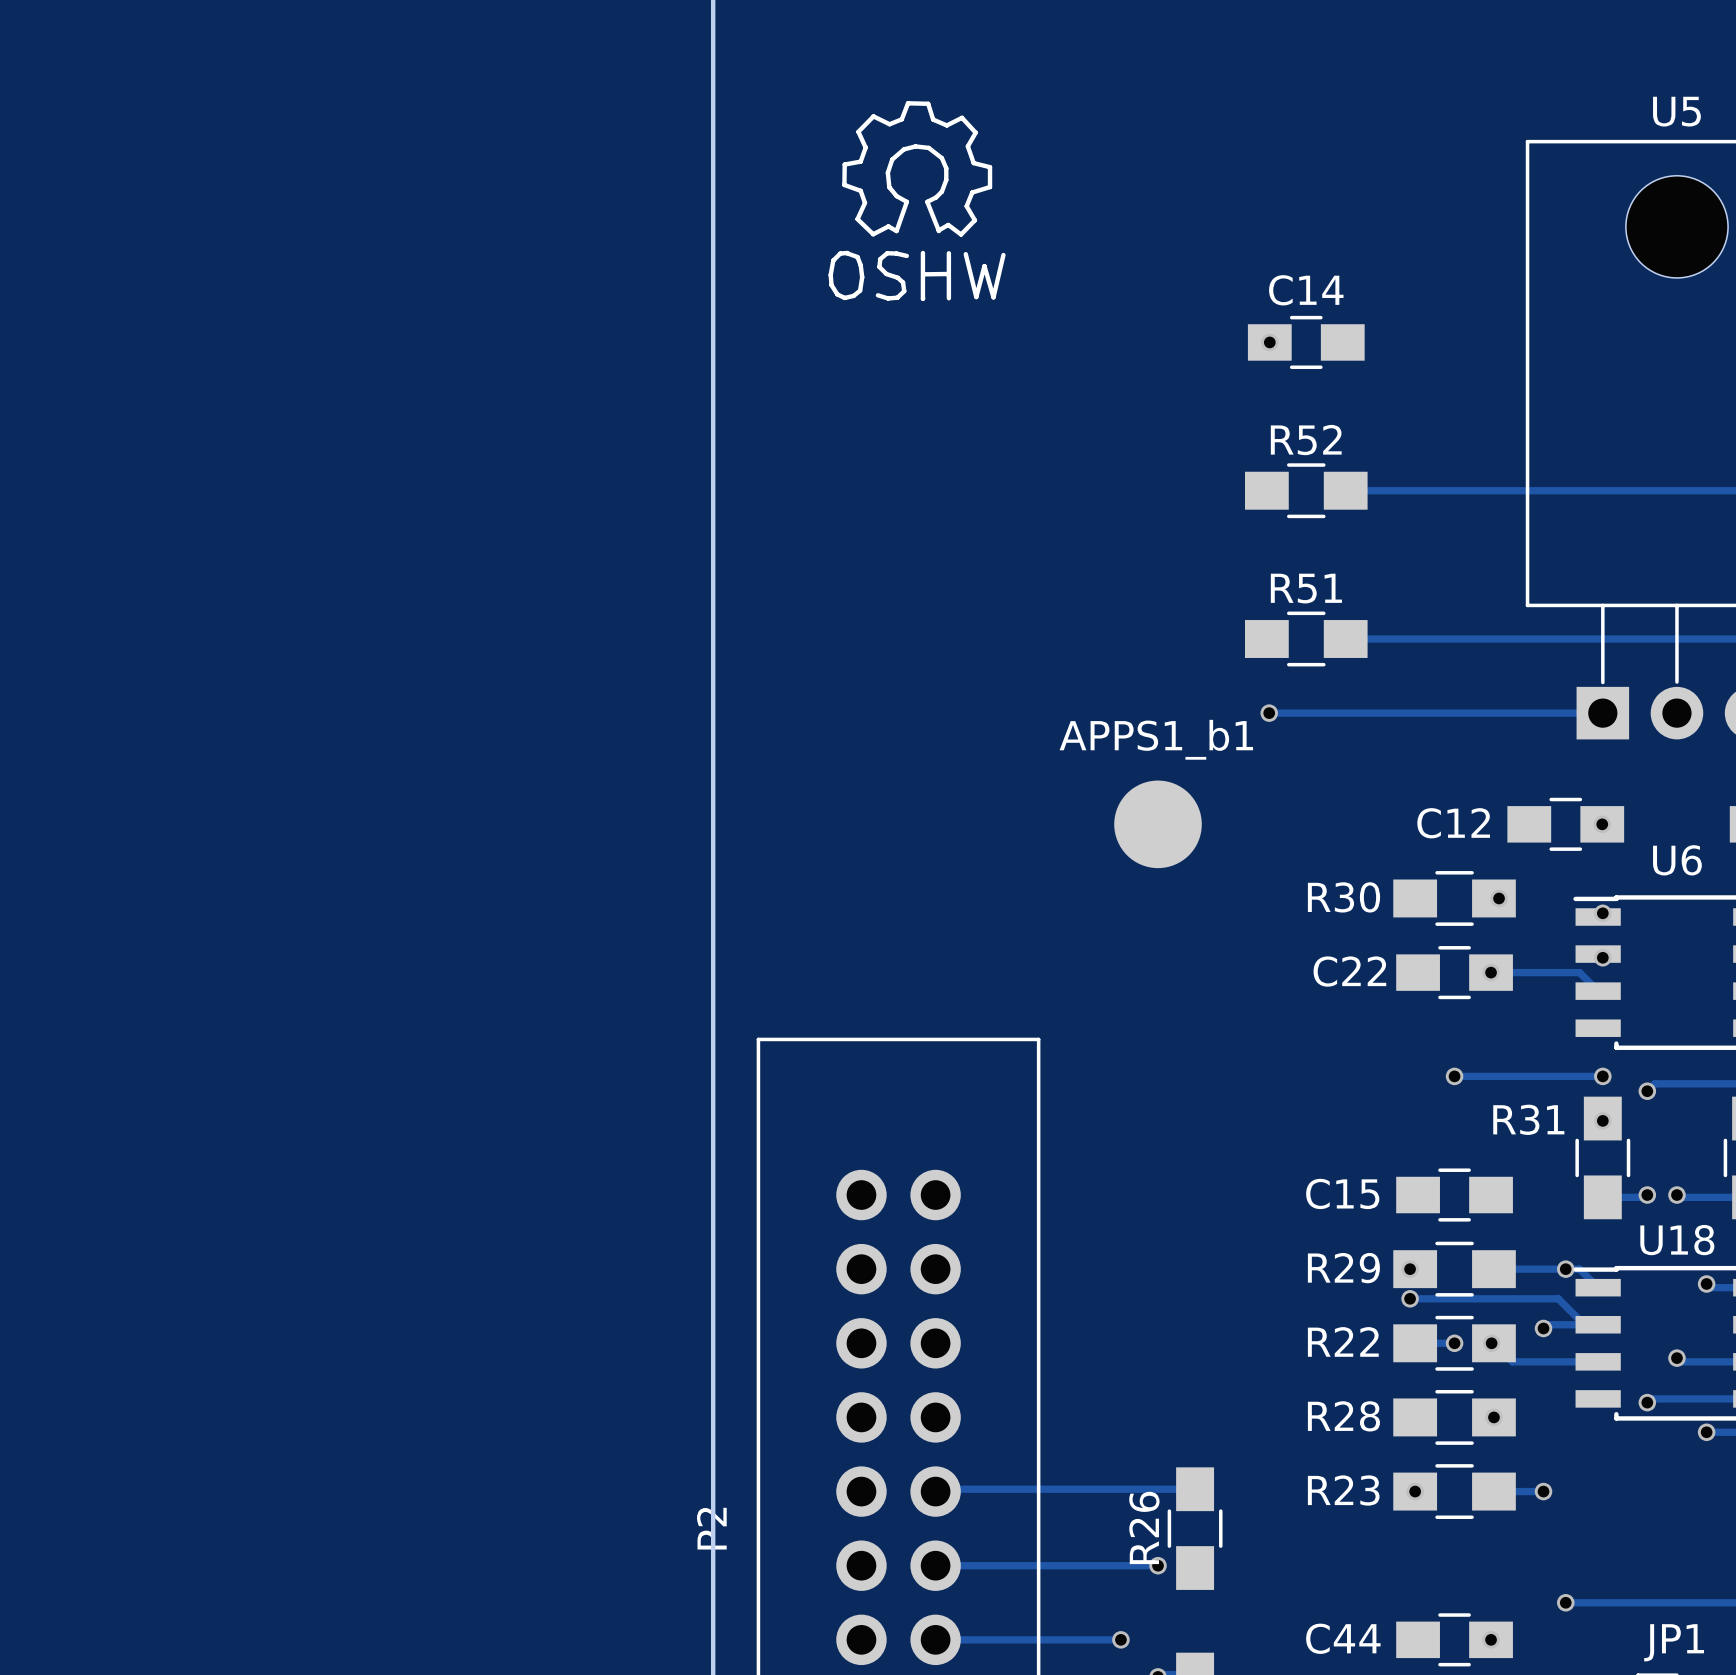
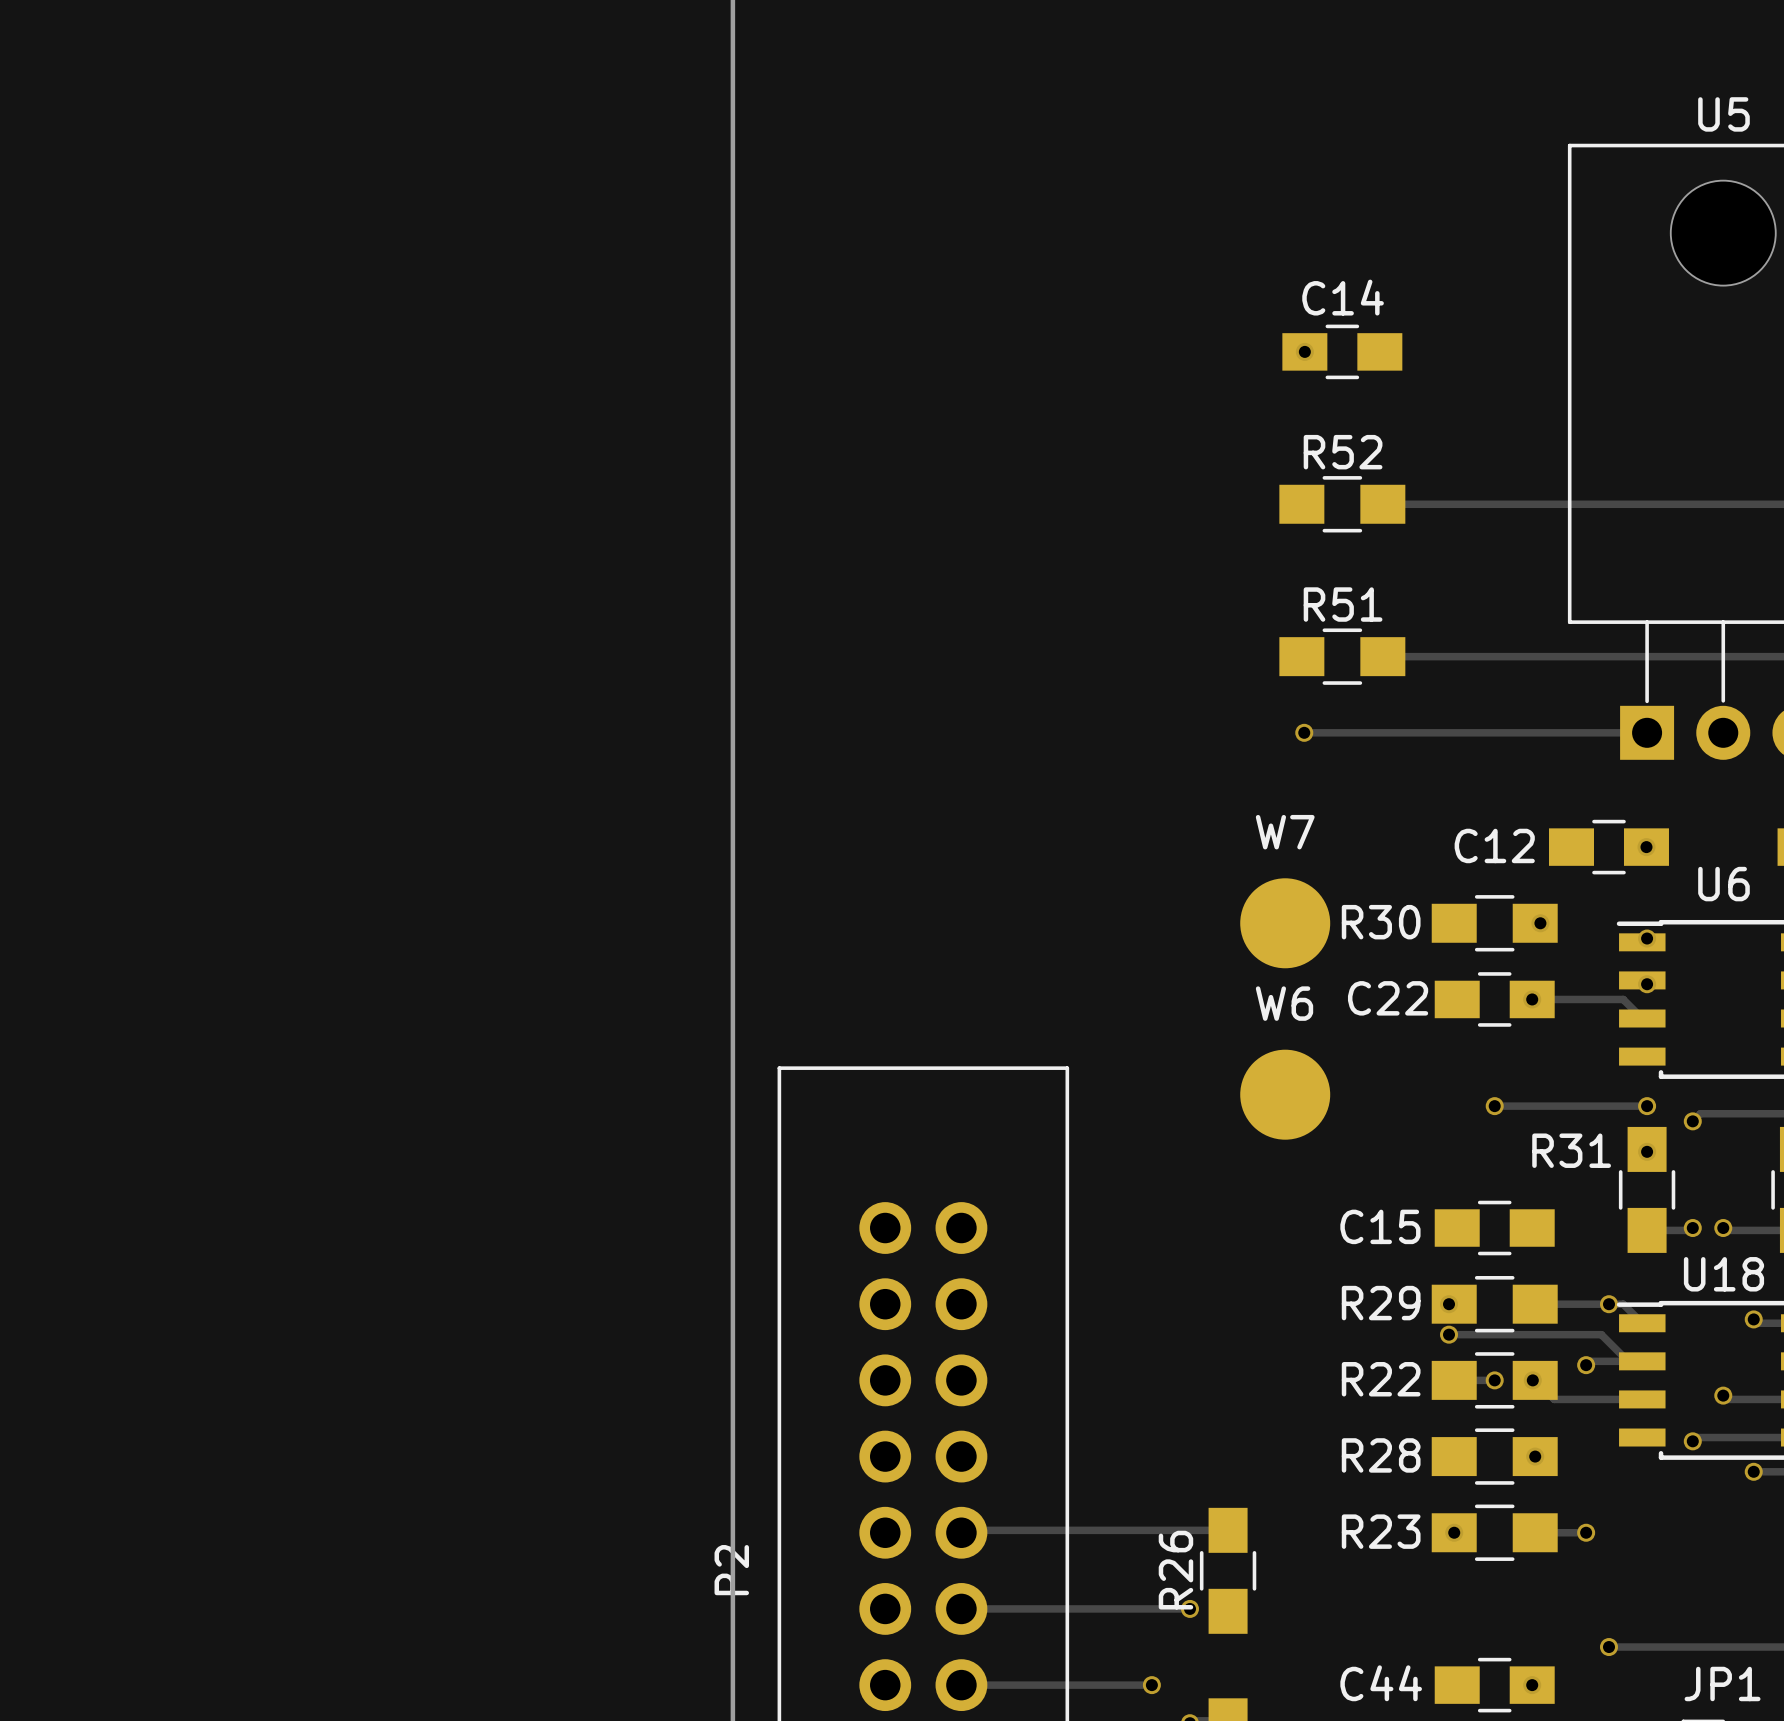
drawing: [828, 101, 1006, 301] -> none
APPS1_b1: (1158, 824) -> none
W7: none -> (1285, 923)
W6: none -> (1285, 1094)

